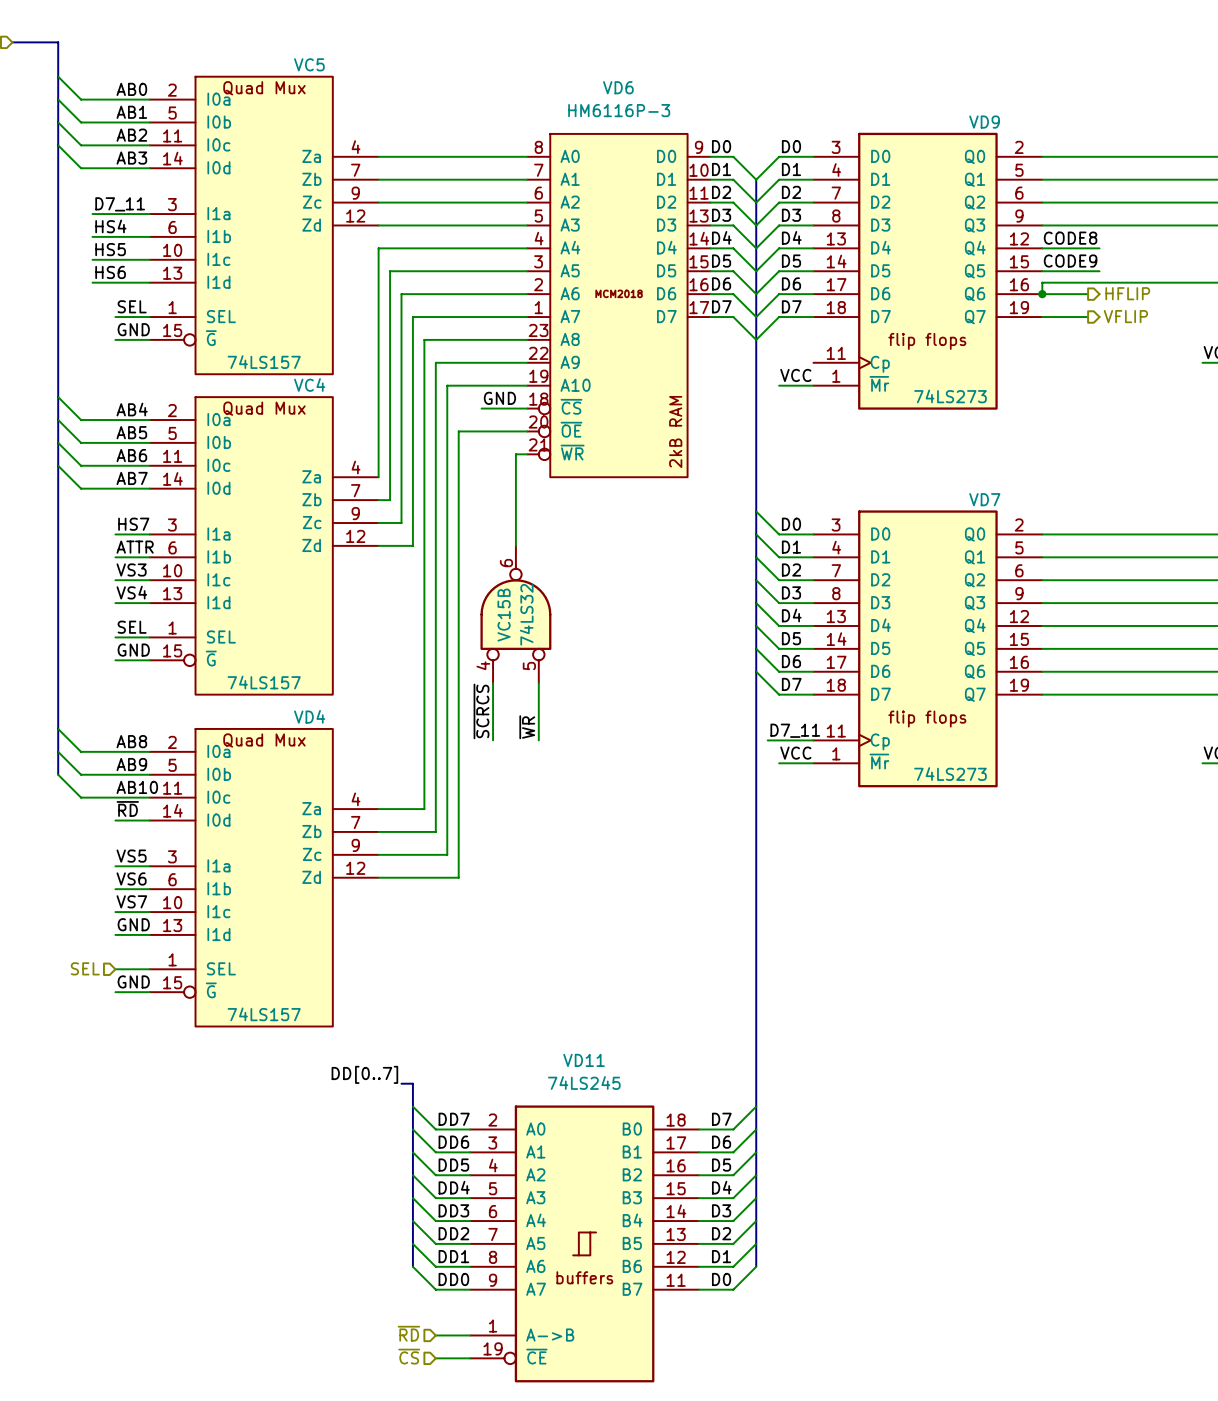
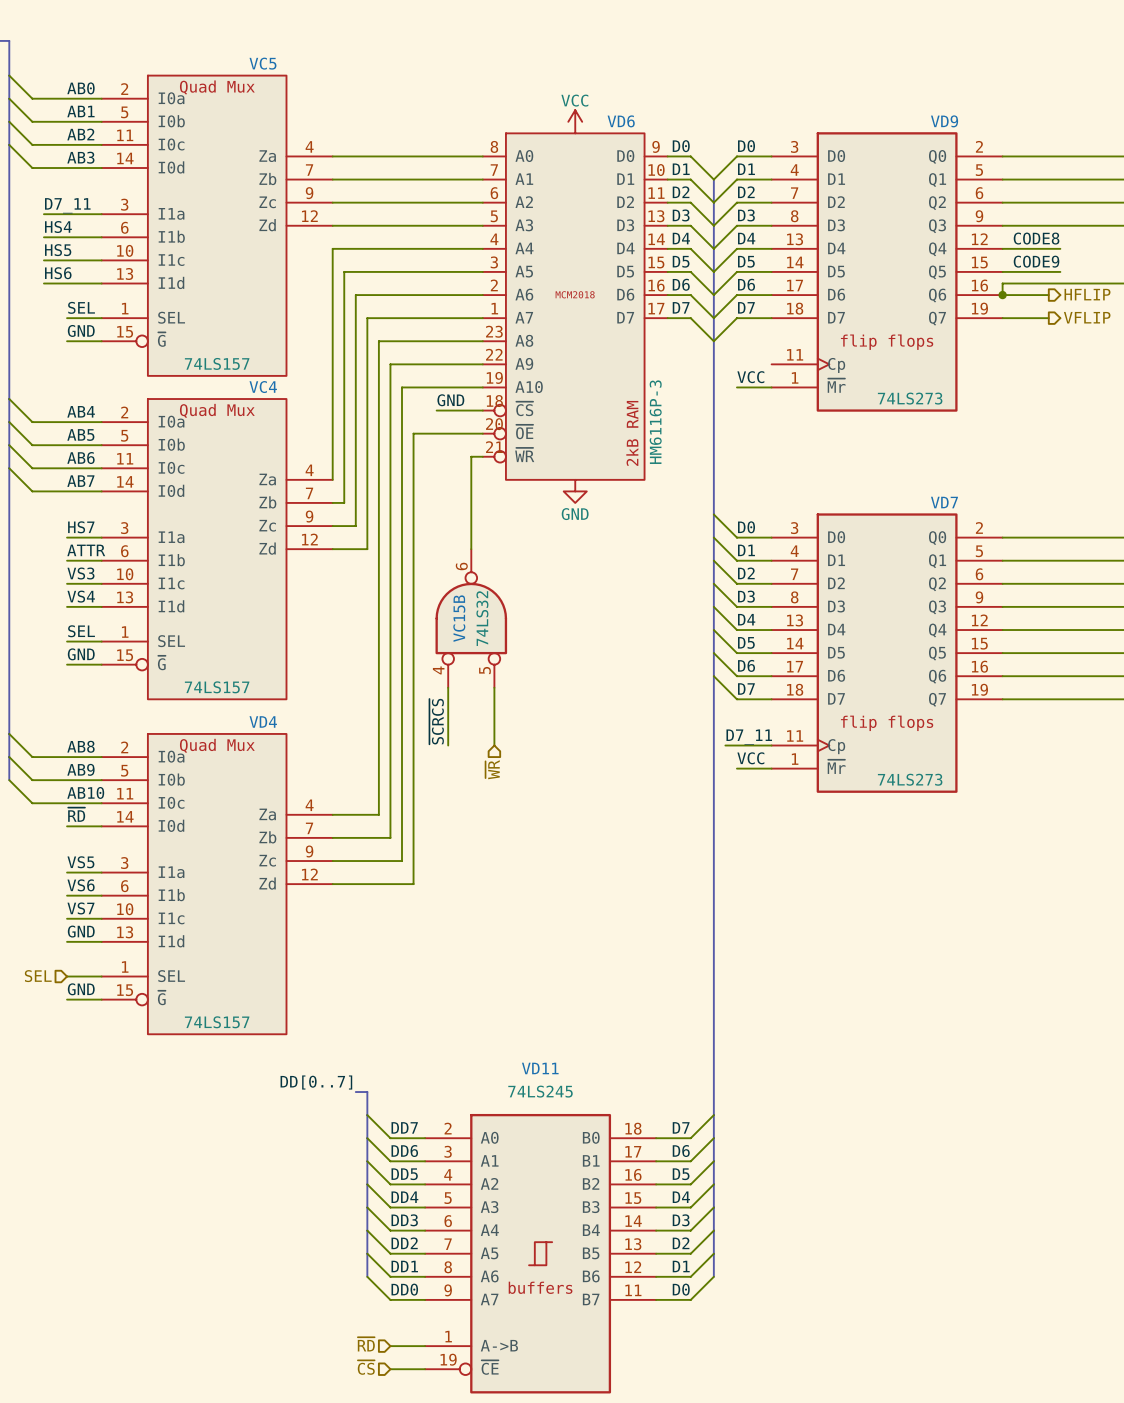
VD6 name position: VD6 (618, 87) -> VD6 (621, 121)
VD6 value rotation: 0° (619, 110) -> 90° counterclockwise (655, 422)
VD6 value position: HM6116P-3 (619, 110) -> HM6116P-3 (655, 422)
power symbol: none -> VCC (575, 121)
power symbol: none -> GND (575, 491)
label: ~{WR} (527, 727) -> none
hierarchical label: none -> ~{WR} (492, 769)

